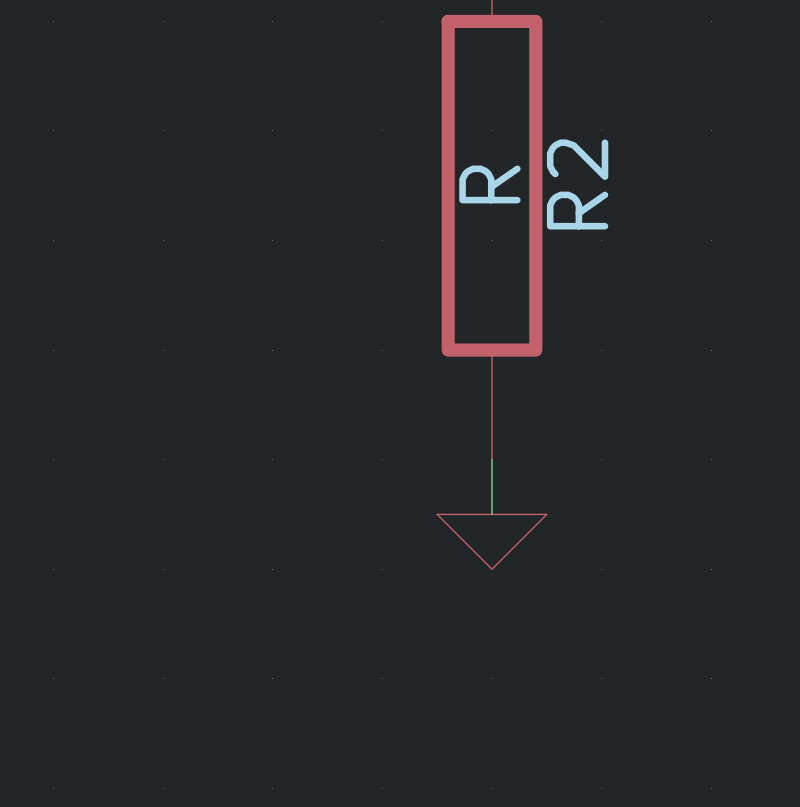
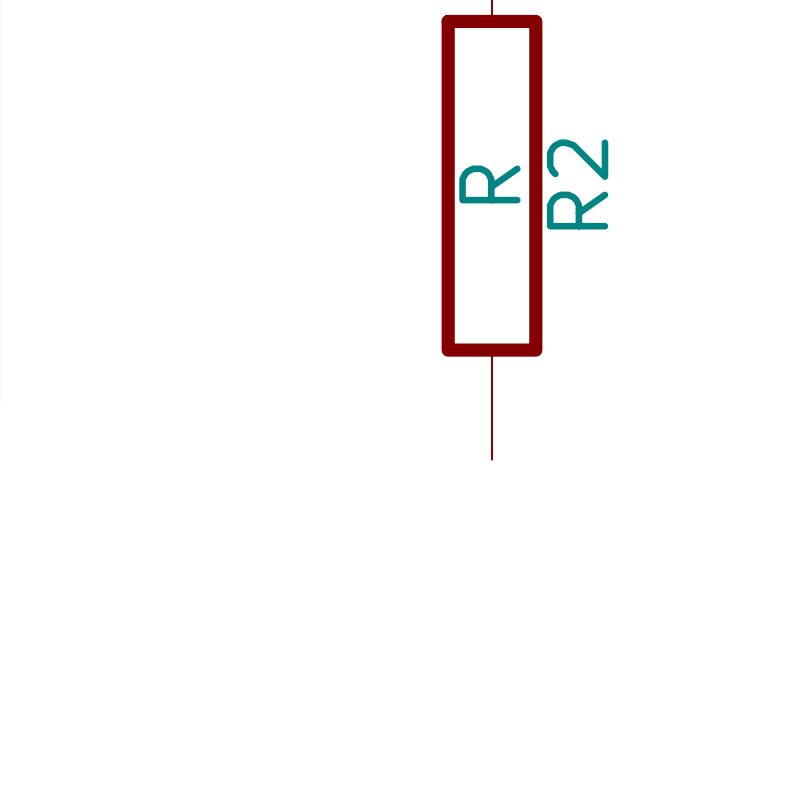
wire: (492, 459) (492, 514) -> none
power symbol: (492, 541) -> none

